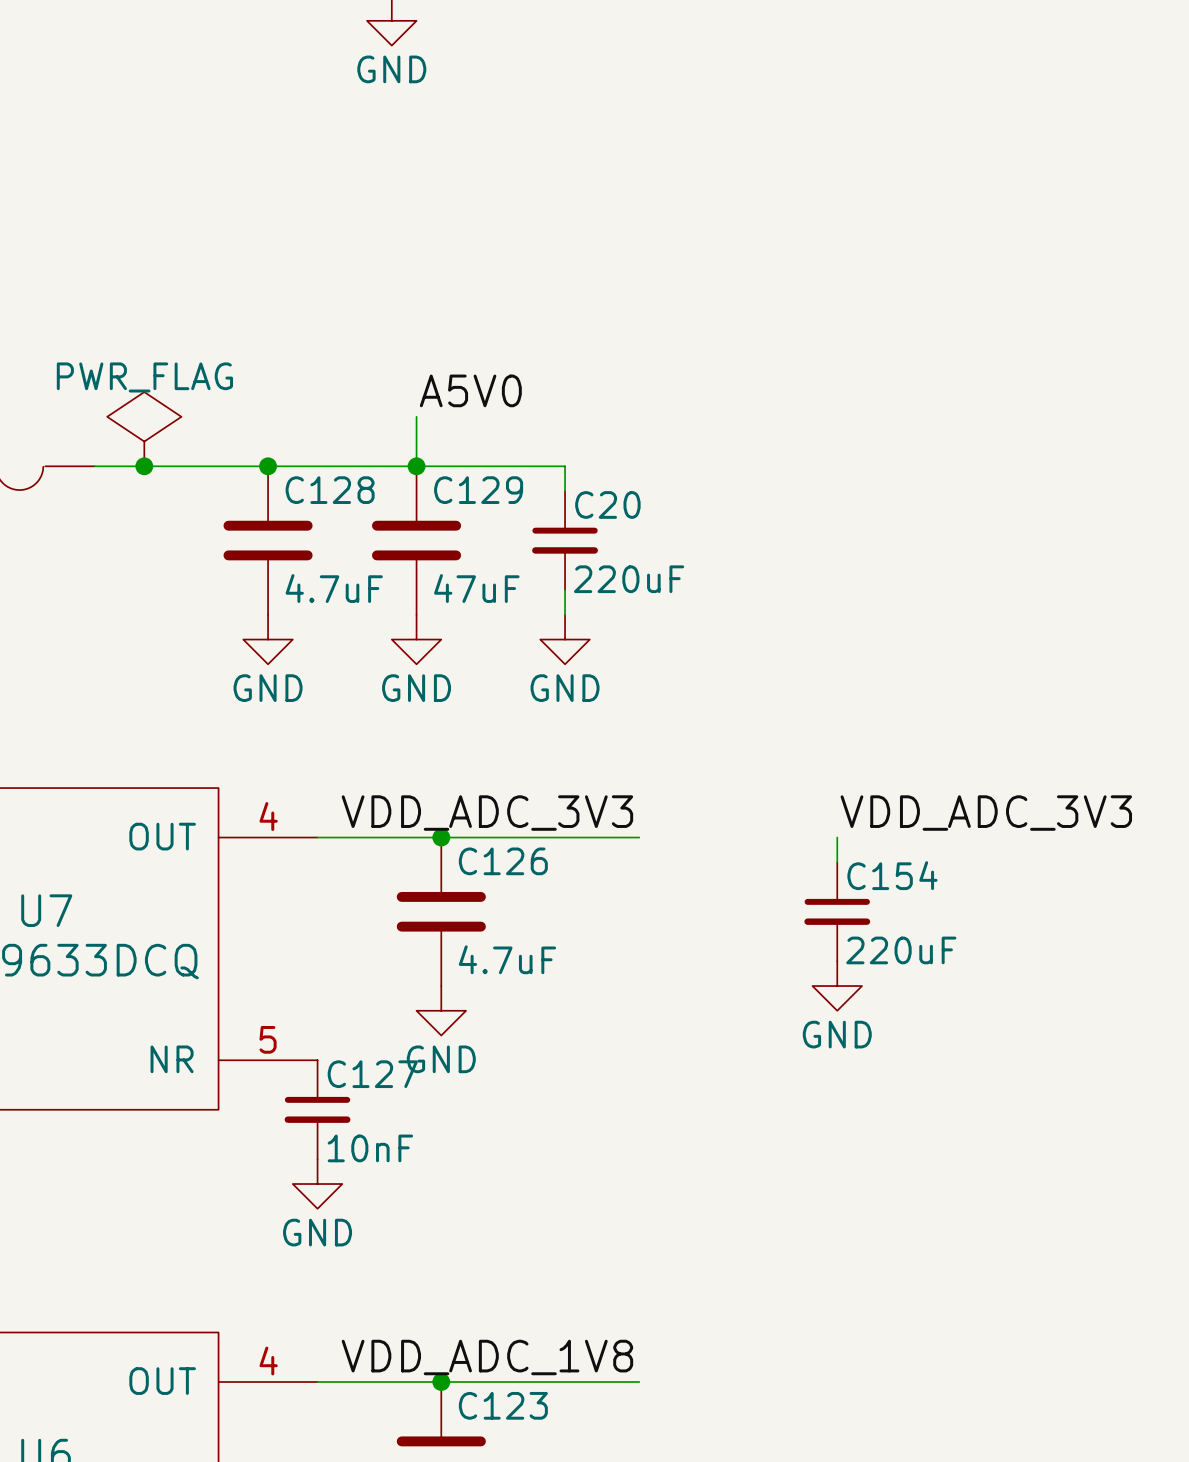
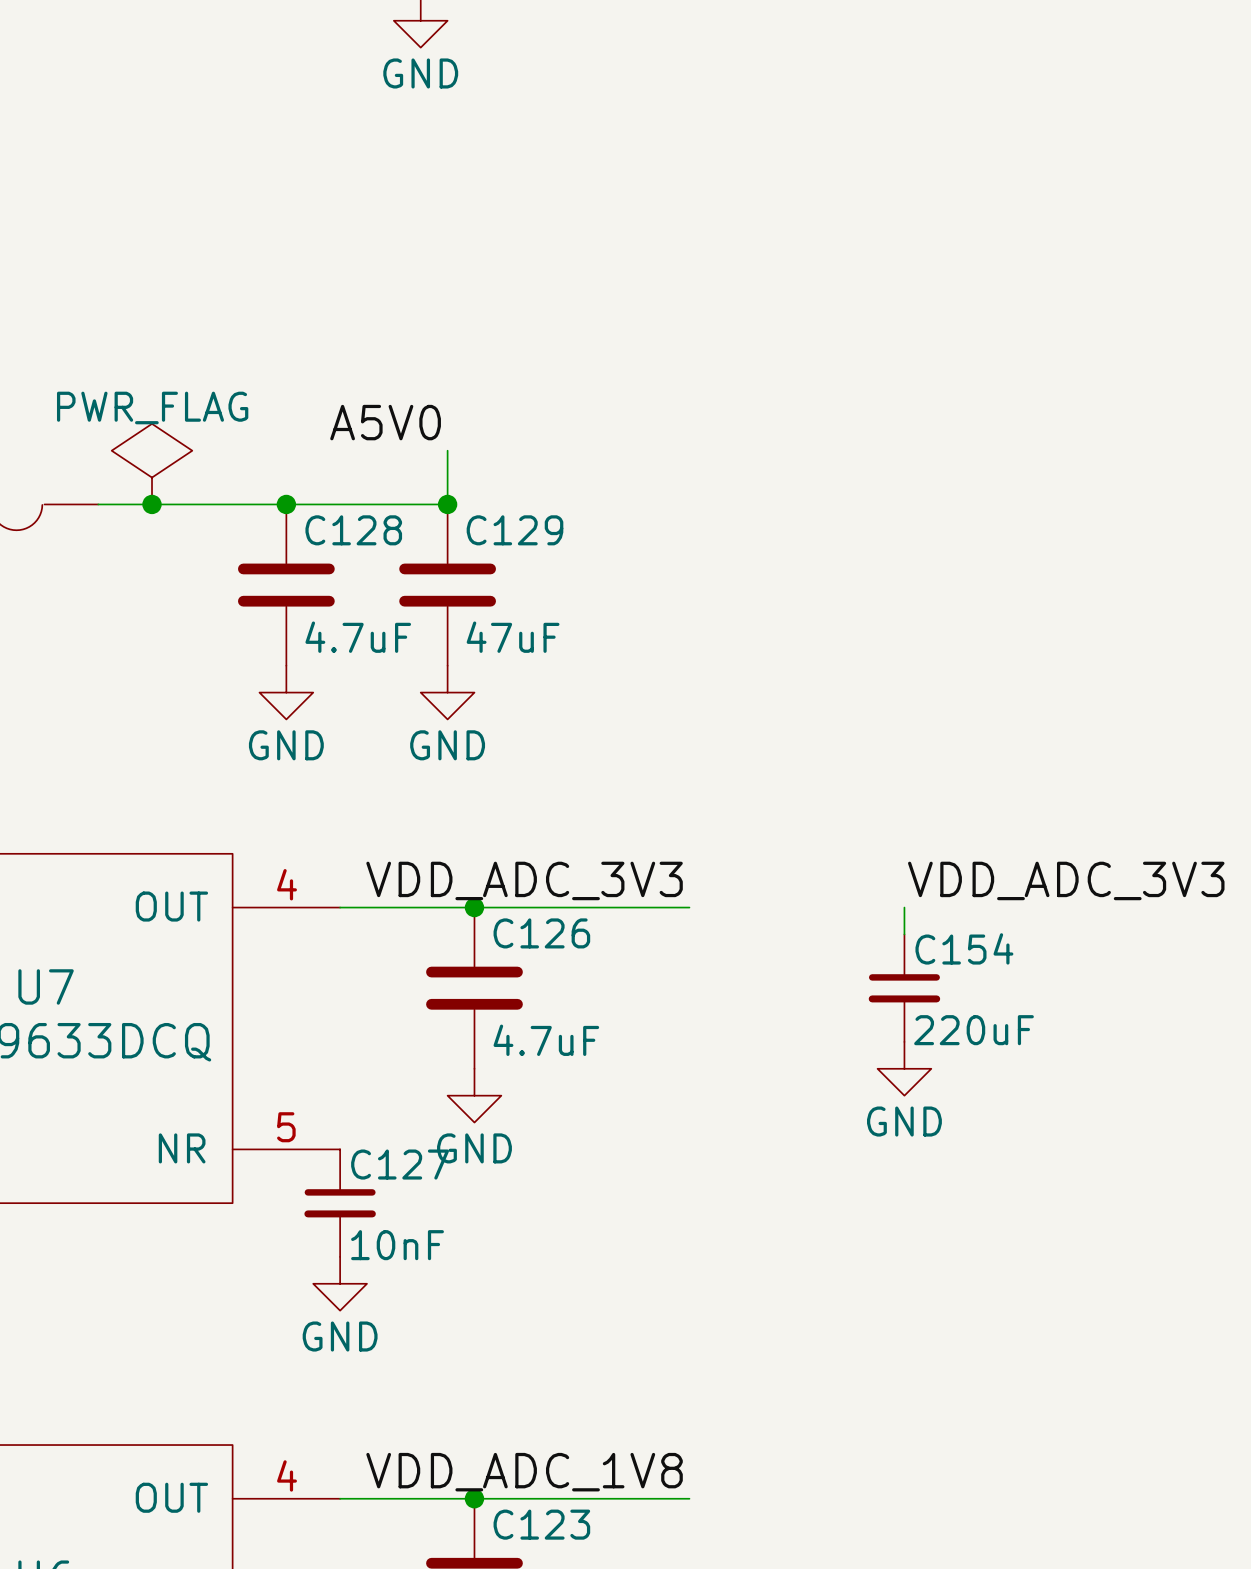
label position: A5V0 (470, 390) -> A5V0 (385, 422)
wire: (416, 466) (565, 466) (565, 491) -> none
C20: 220uF (565, 540) -> none
wire: (565, 590) (565, 614) -> none
power symbol: GND (565, 639) -> none

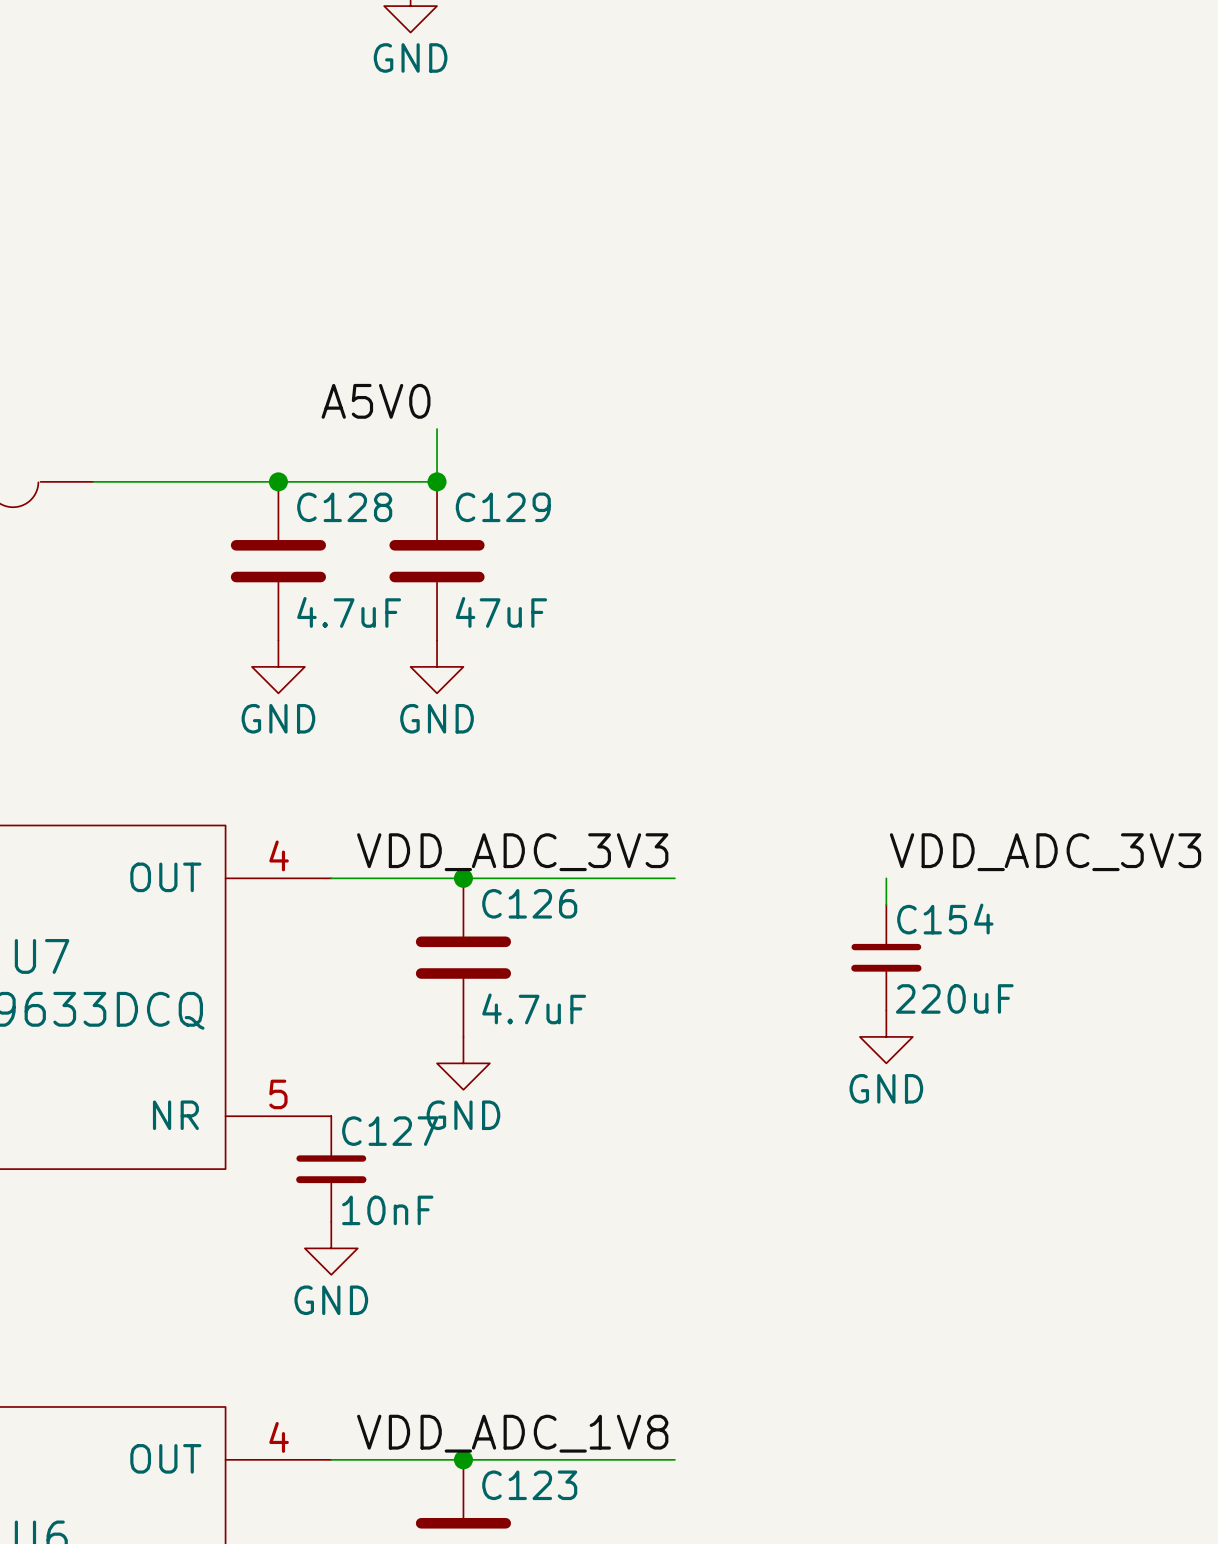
power symbol: PWR_FLAG (152, 464) -> none
junction: (152, 504) -> none

